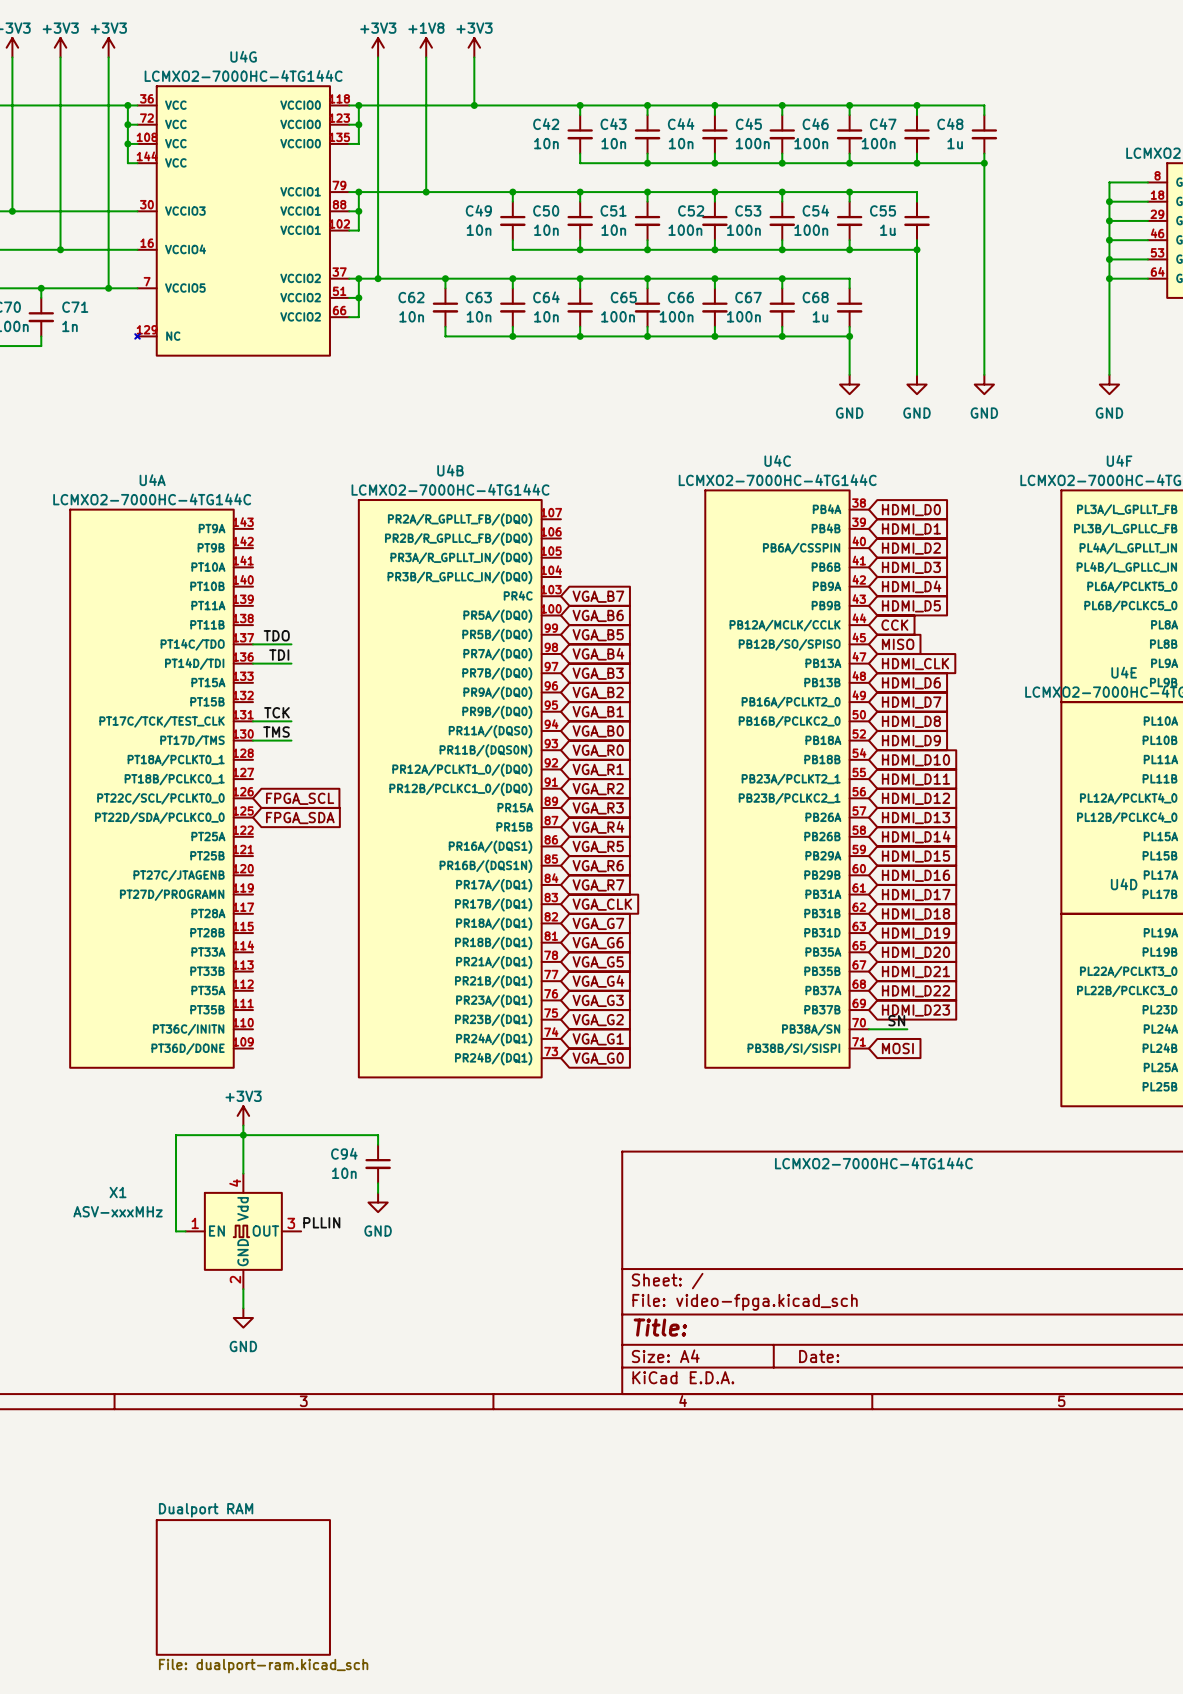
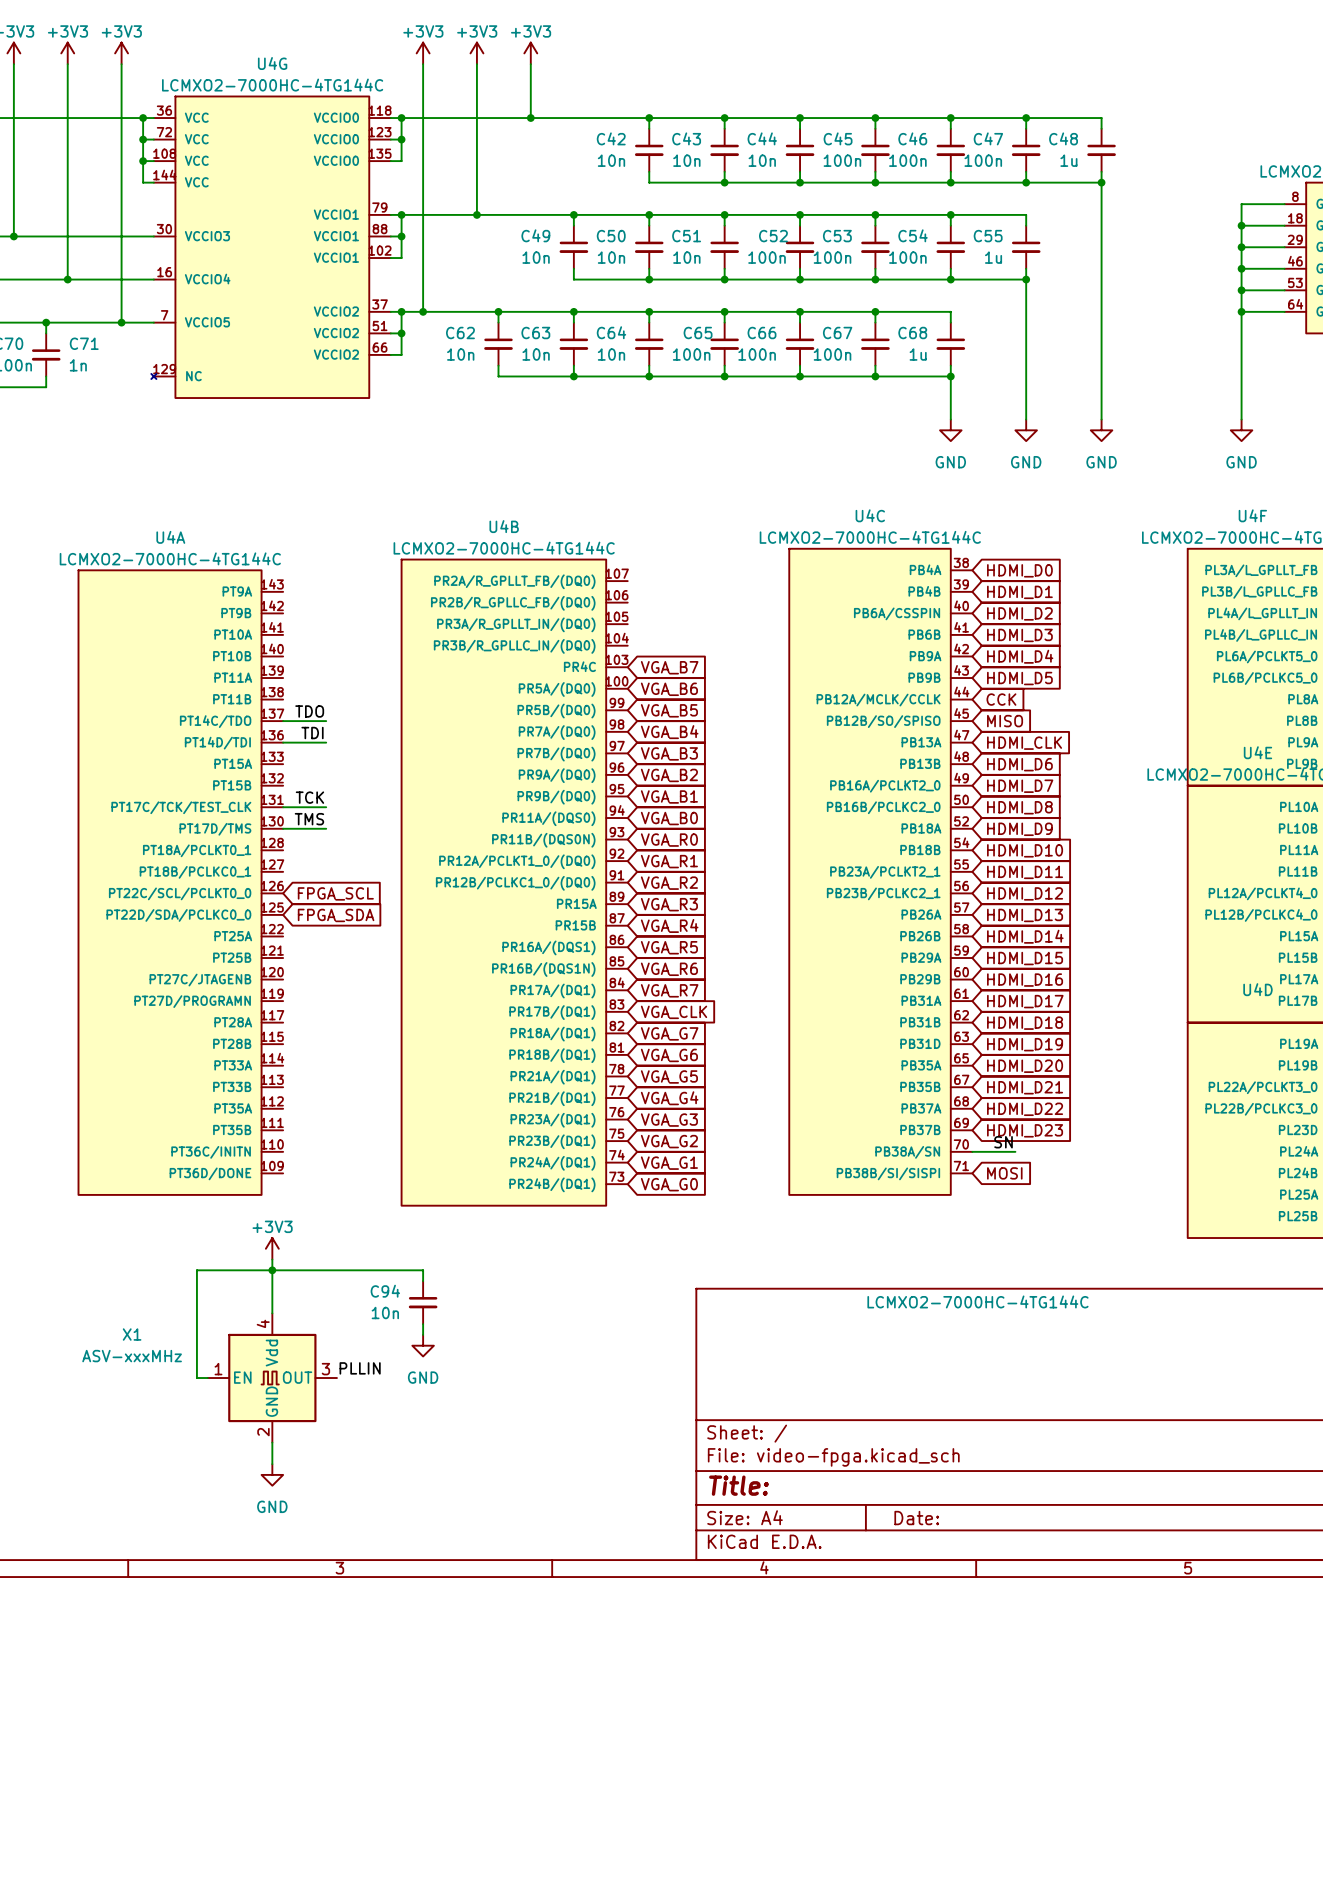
power symbol: +1V8 (426, 47) -> +3V3 (476, 53)
sheet Dualport RAM: File: dualport-ram.kicad_sch (243, 1587) -> none

